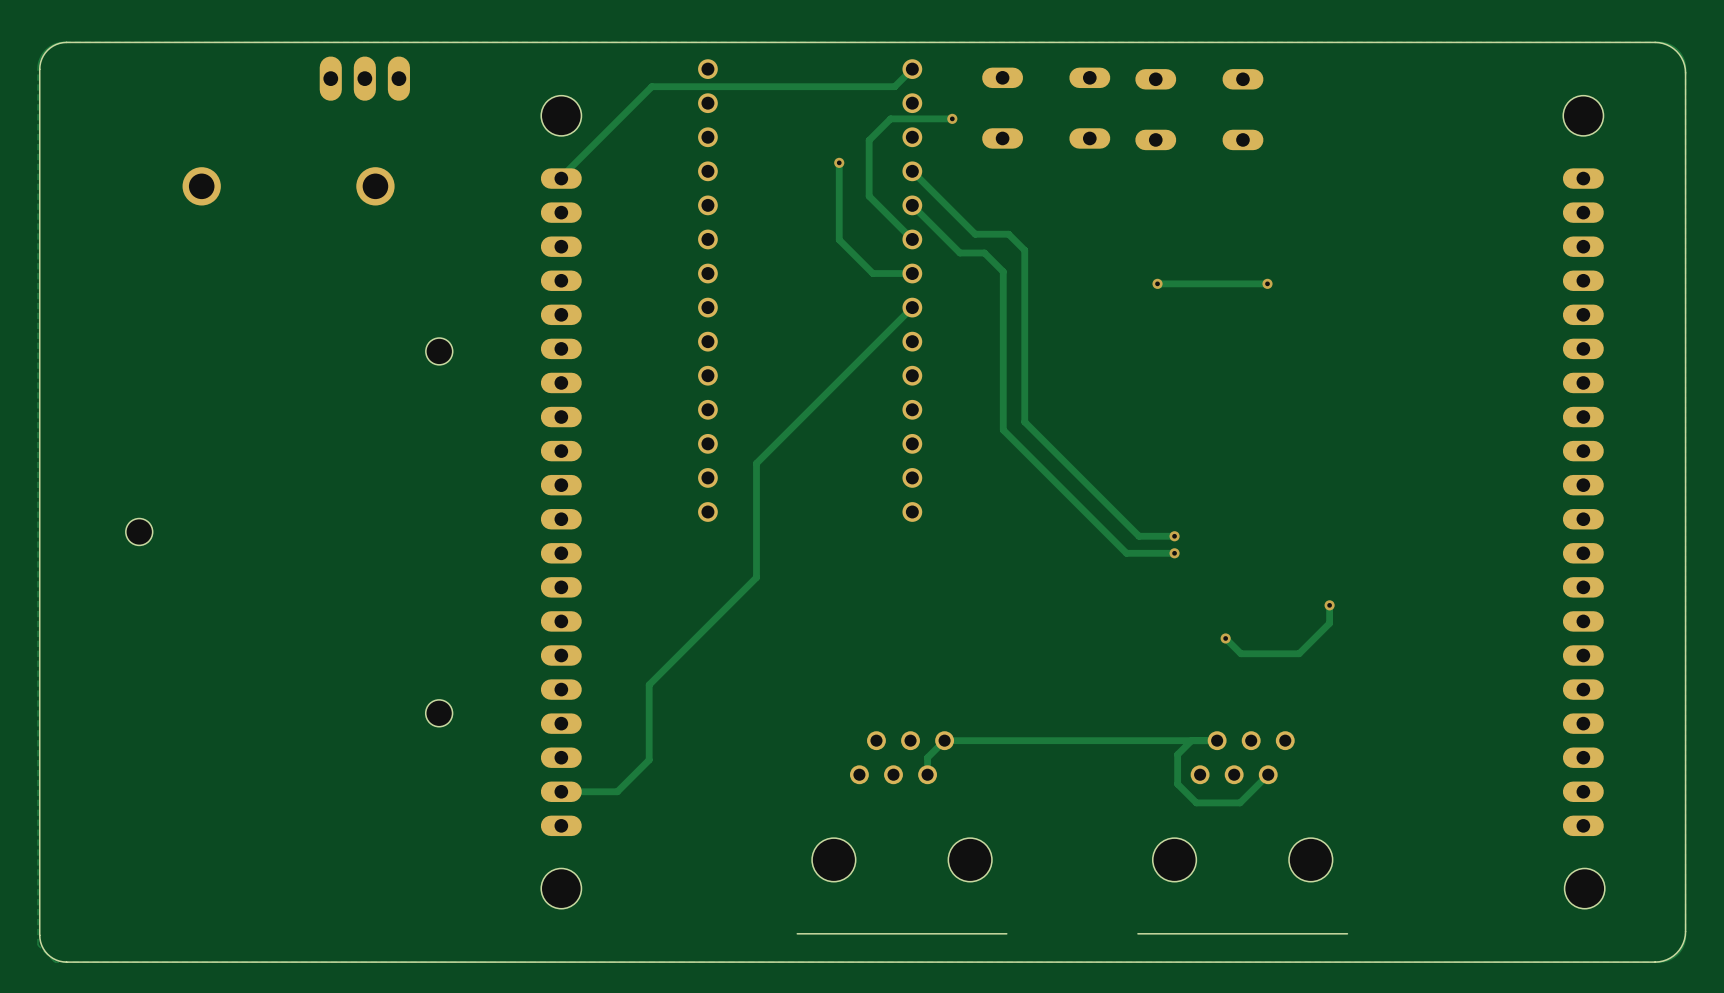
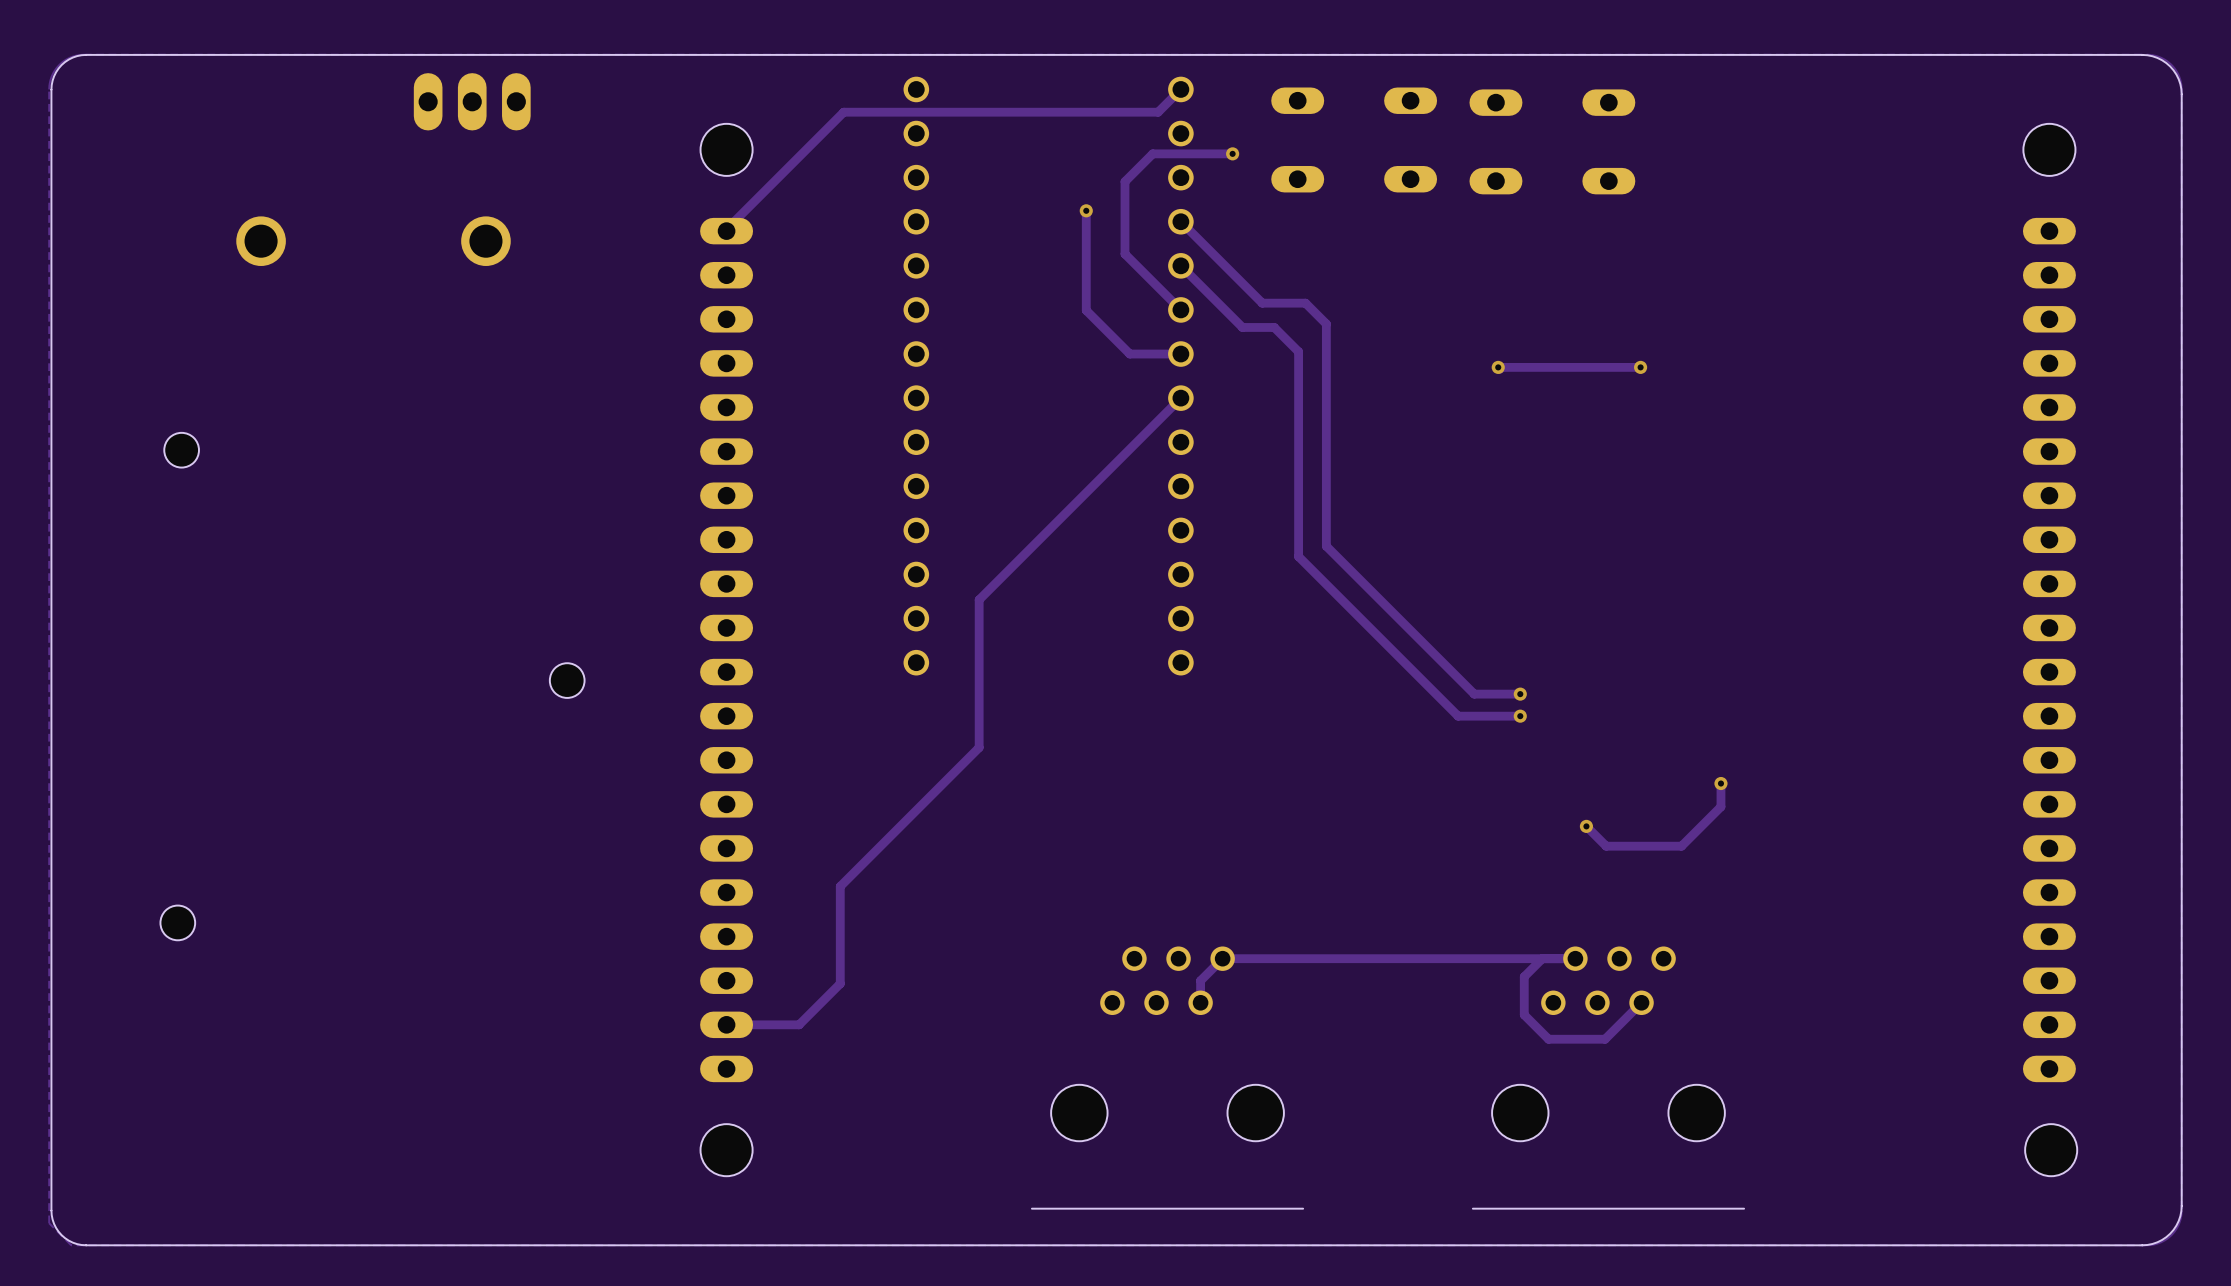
hole: none -> (181, 450)
hole: (439, 351) -> none
hole: none -> (567, 680)
hole: (139, 531) -> none
hole: none -> (177, 922)
hole: (439, 713) -> none

